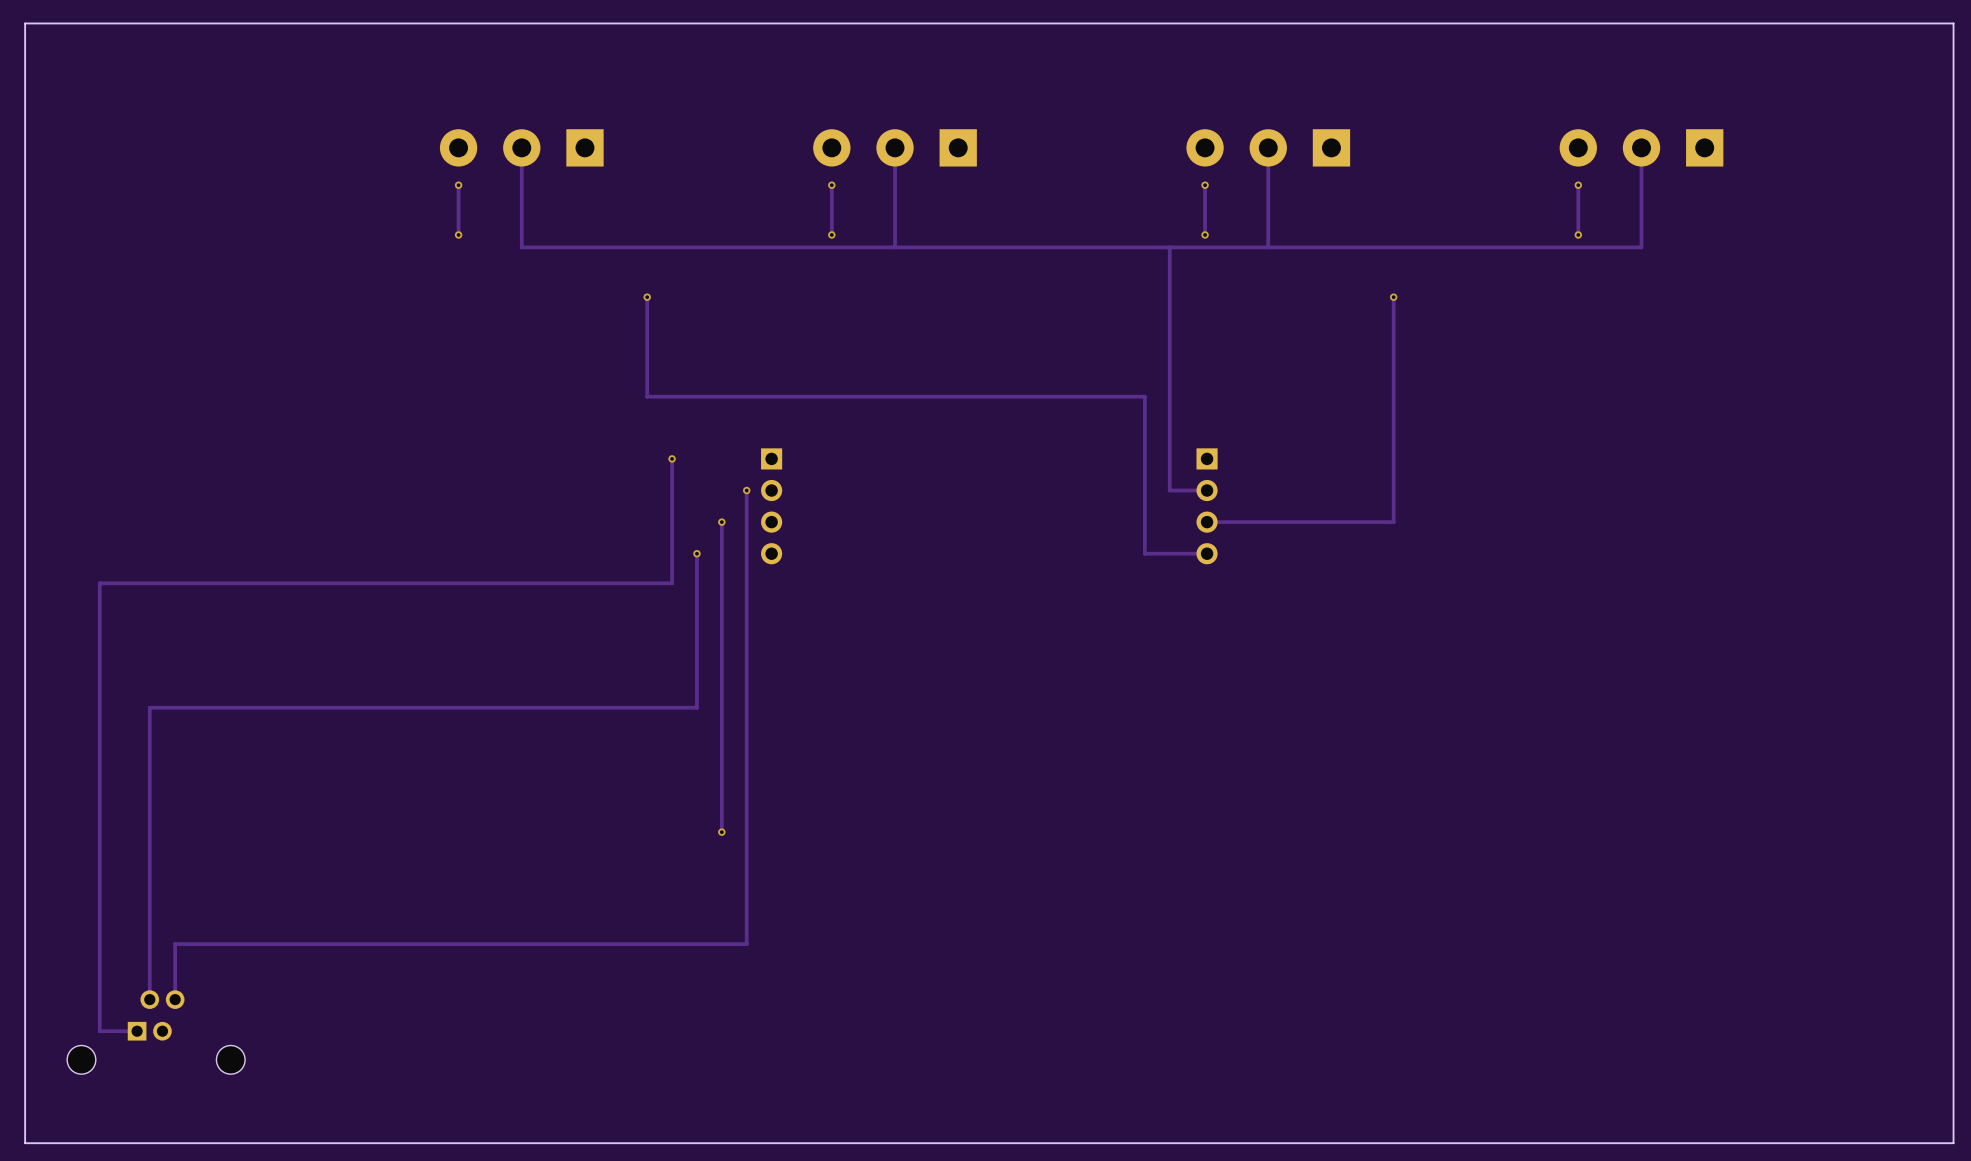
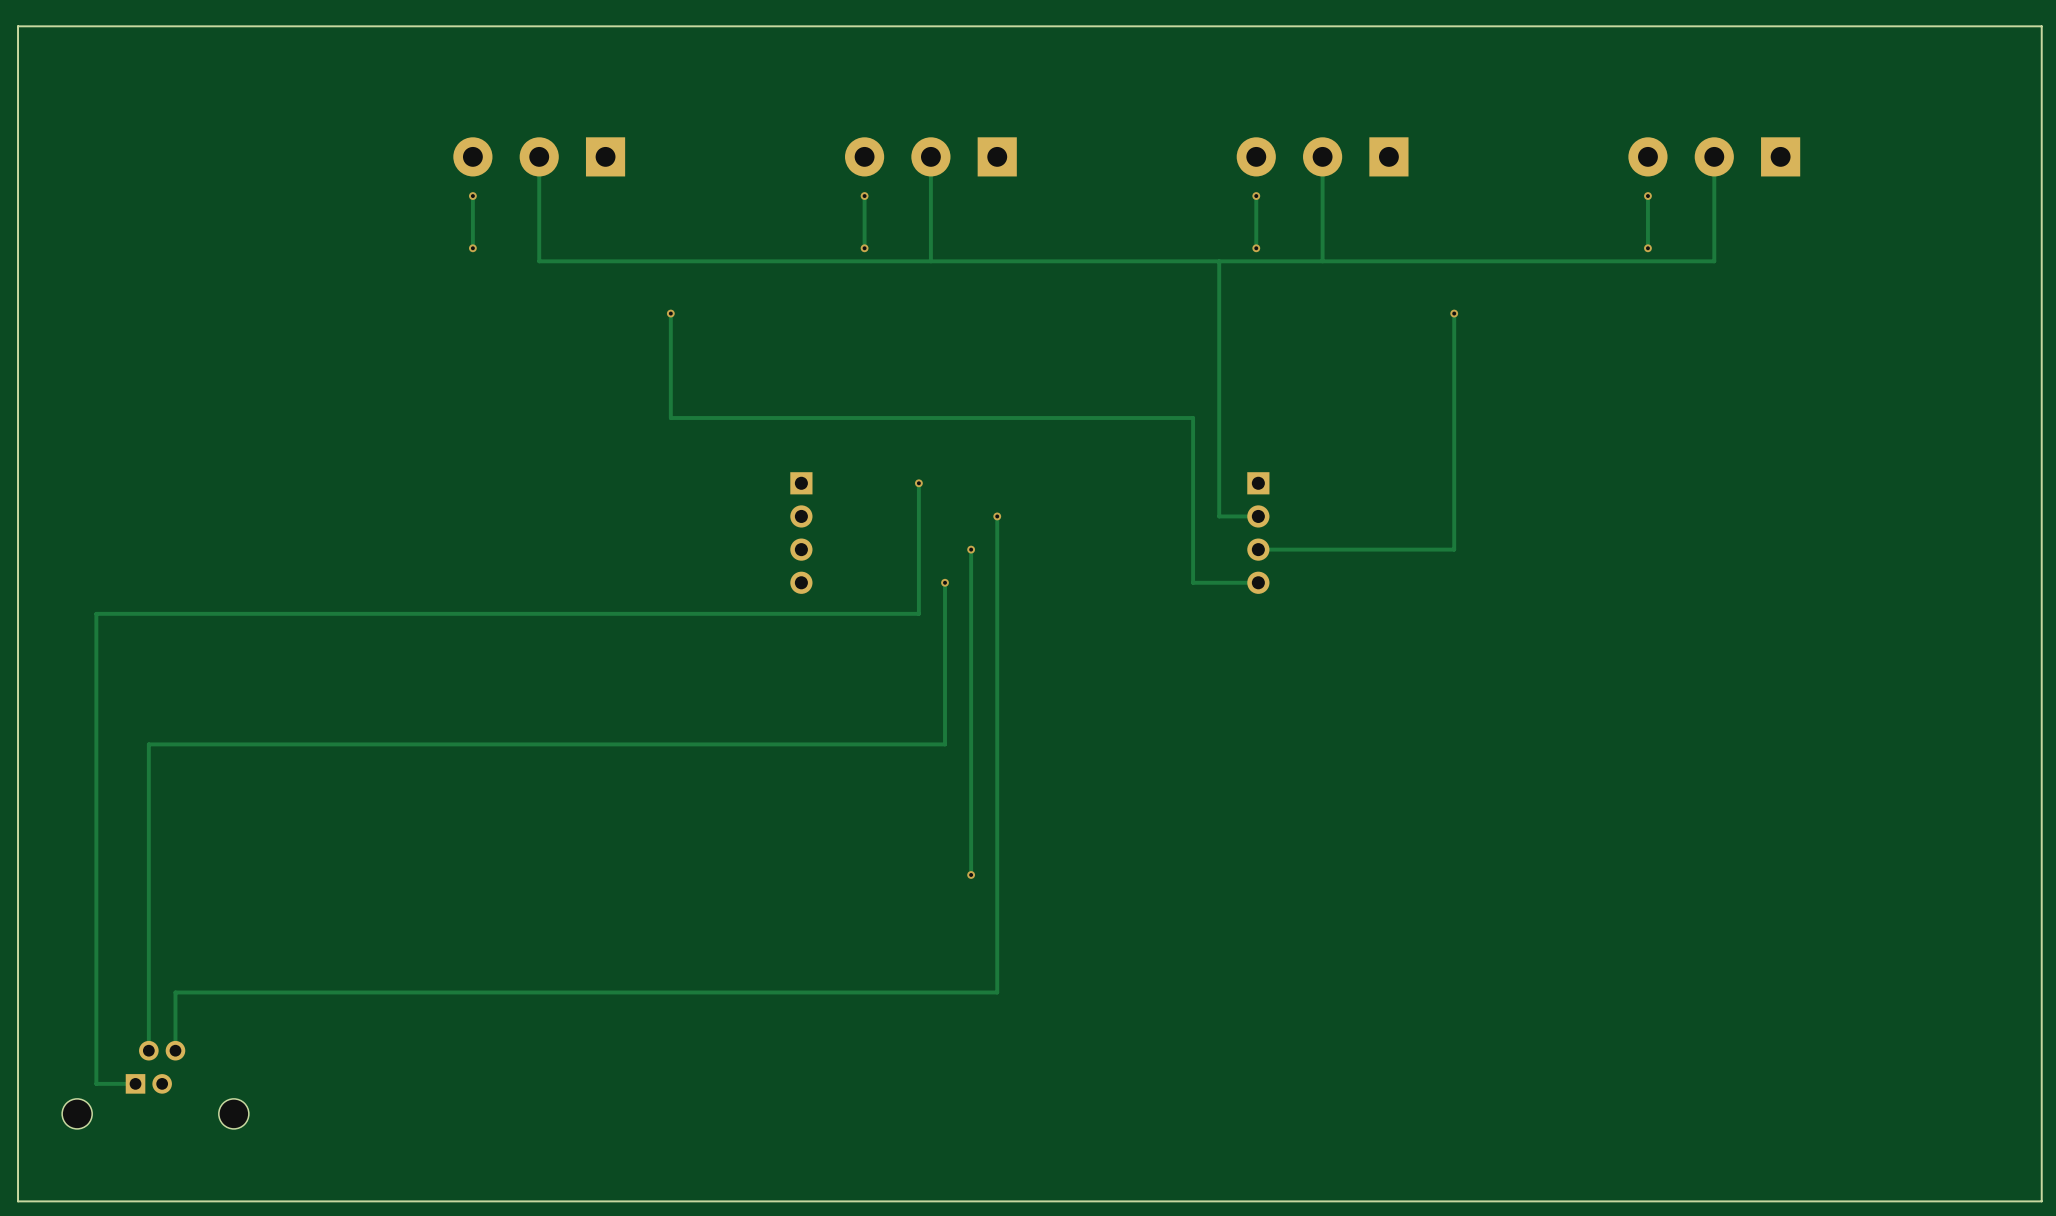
track: (672, 458) (672, 583) -> (918, 483) (918, 613) (696, 613)
via: (672, 458) -> none
via: none -> (918, 483)
track: (746, 490) (746, 944) -> (997, 516) (997, 992) (775, 992)
via: (746, 490) -> none
via: none -> (997, 516)
track: (721, 522) (721, 832) -> (971, 549) (971, 874)
via: (721, 522) -> none
via: none -> (971, 549)
track: (696, 553) (696, 707) -> (945, 582) (945, 744) (723, 744)
via: (696, 553) -> none
via: none -> (945, 582)
via: (721, 832) -> none
via: none -> (971, 874)

